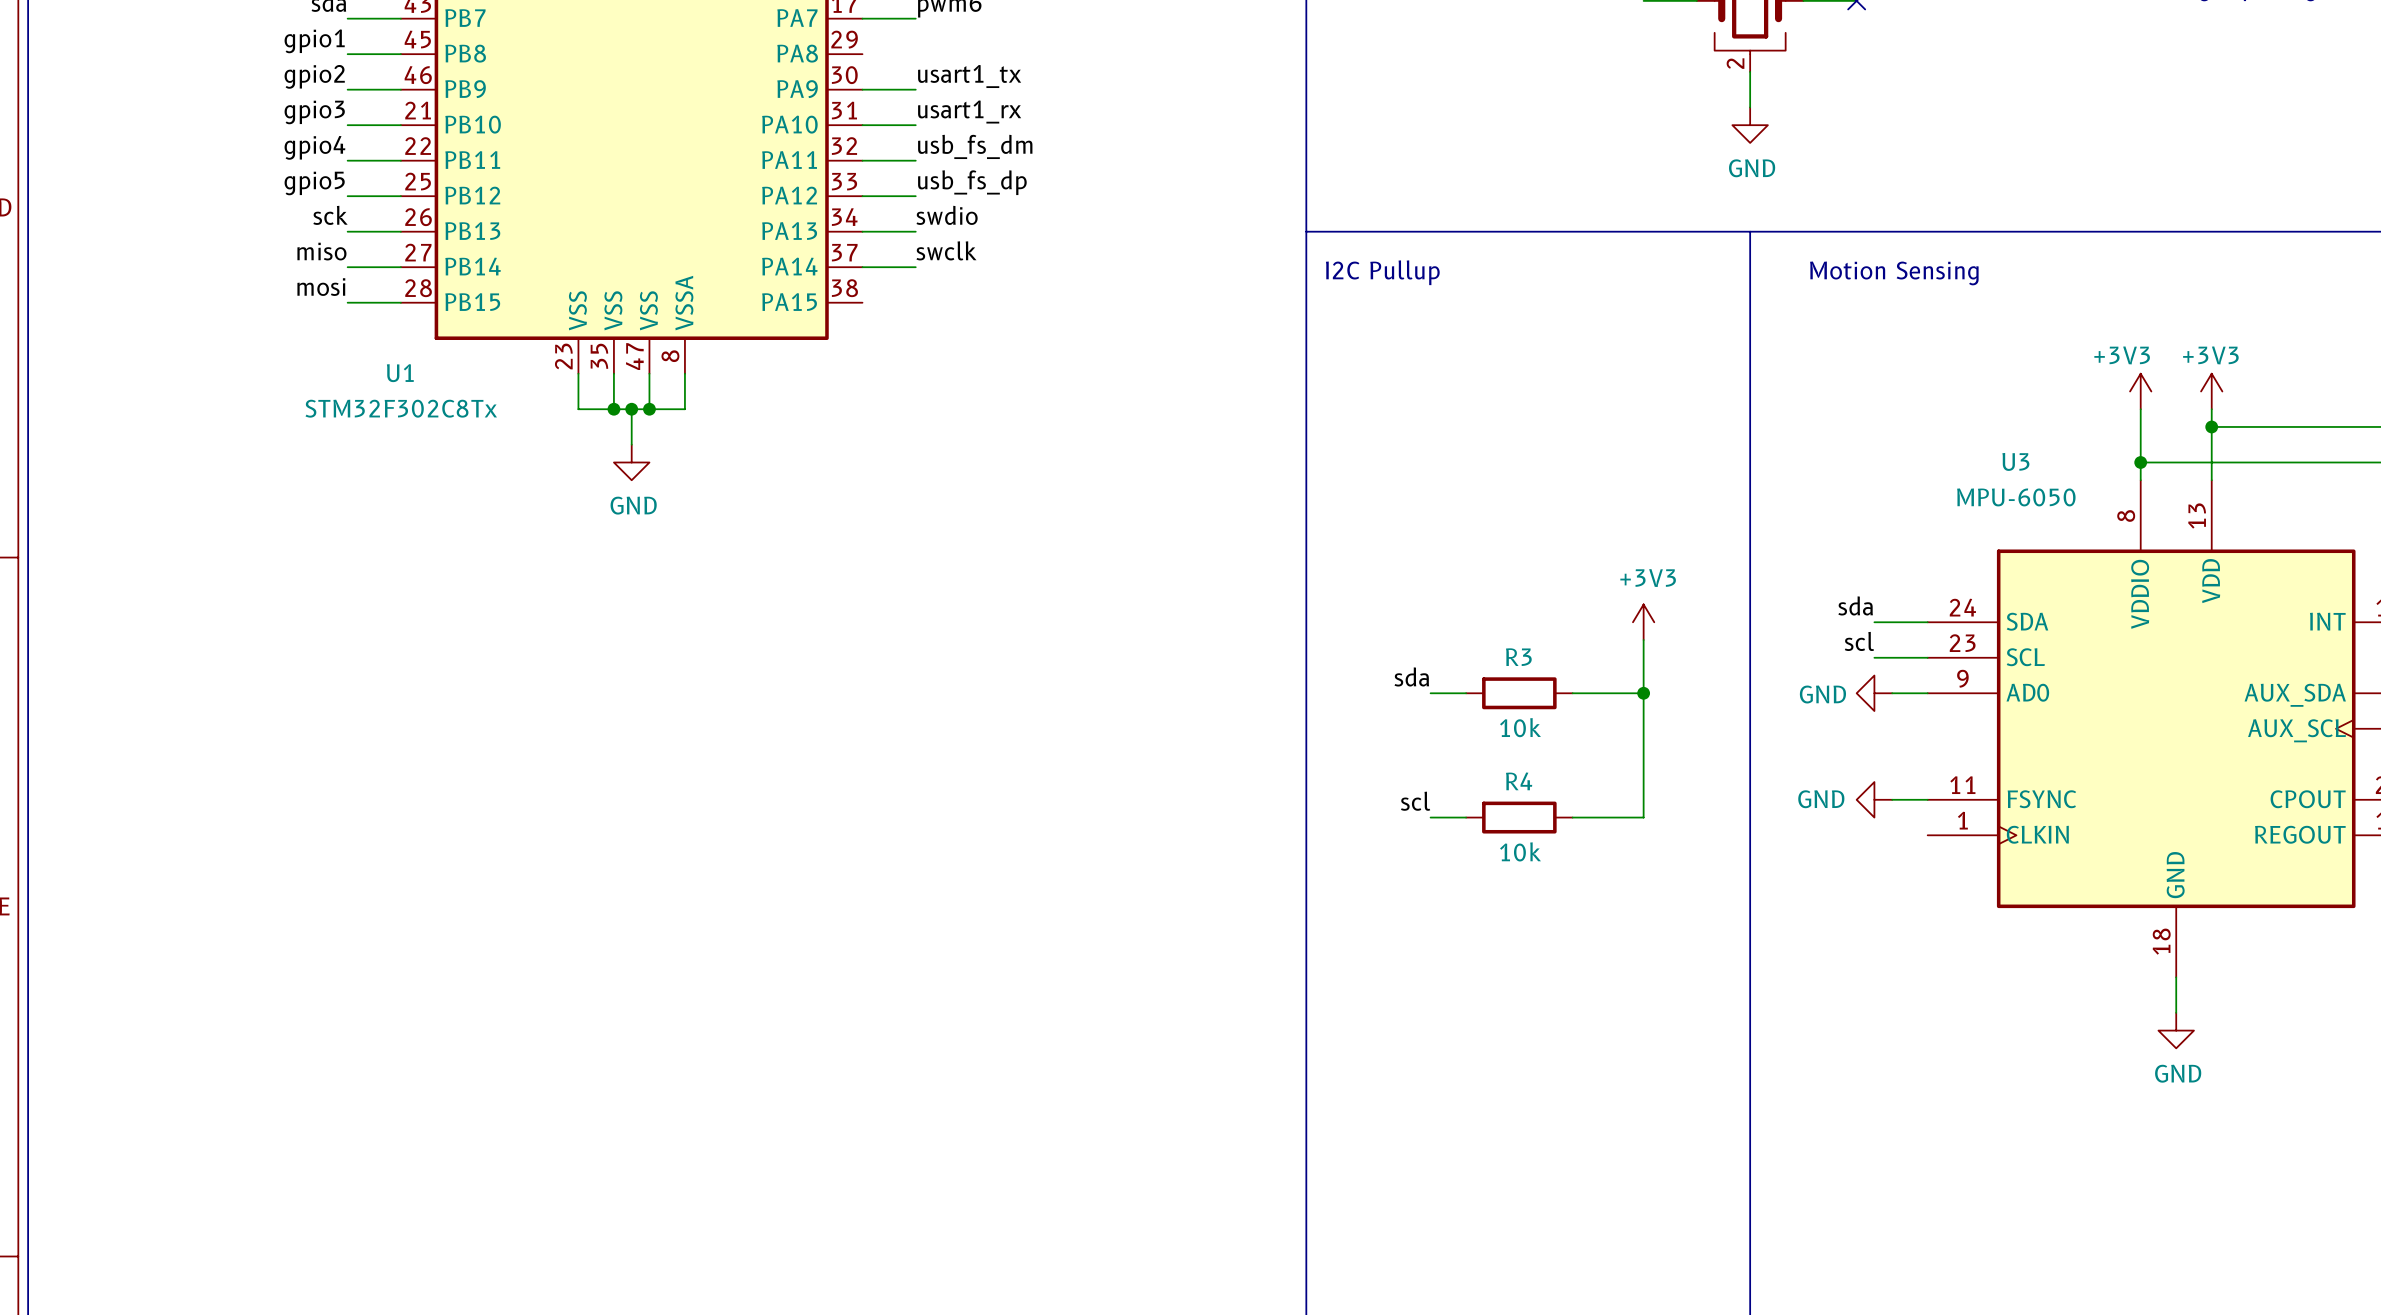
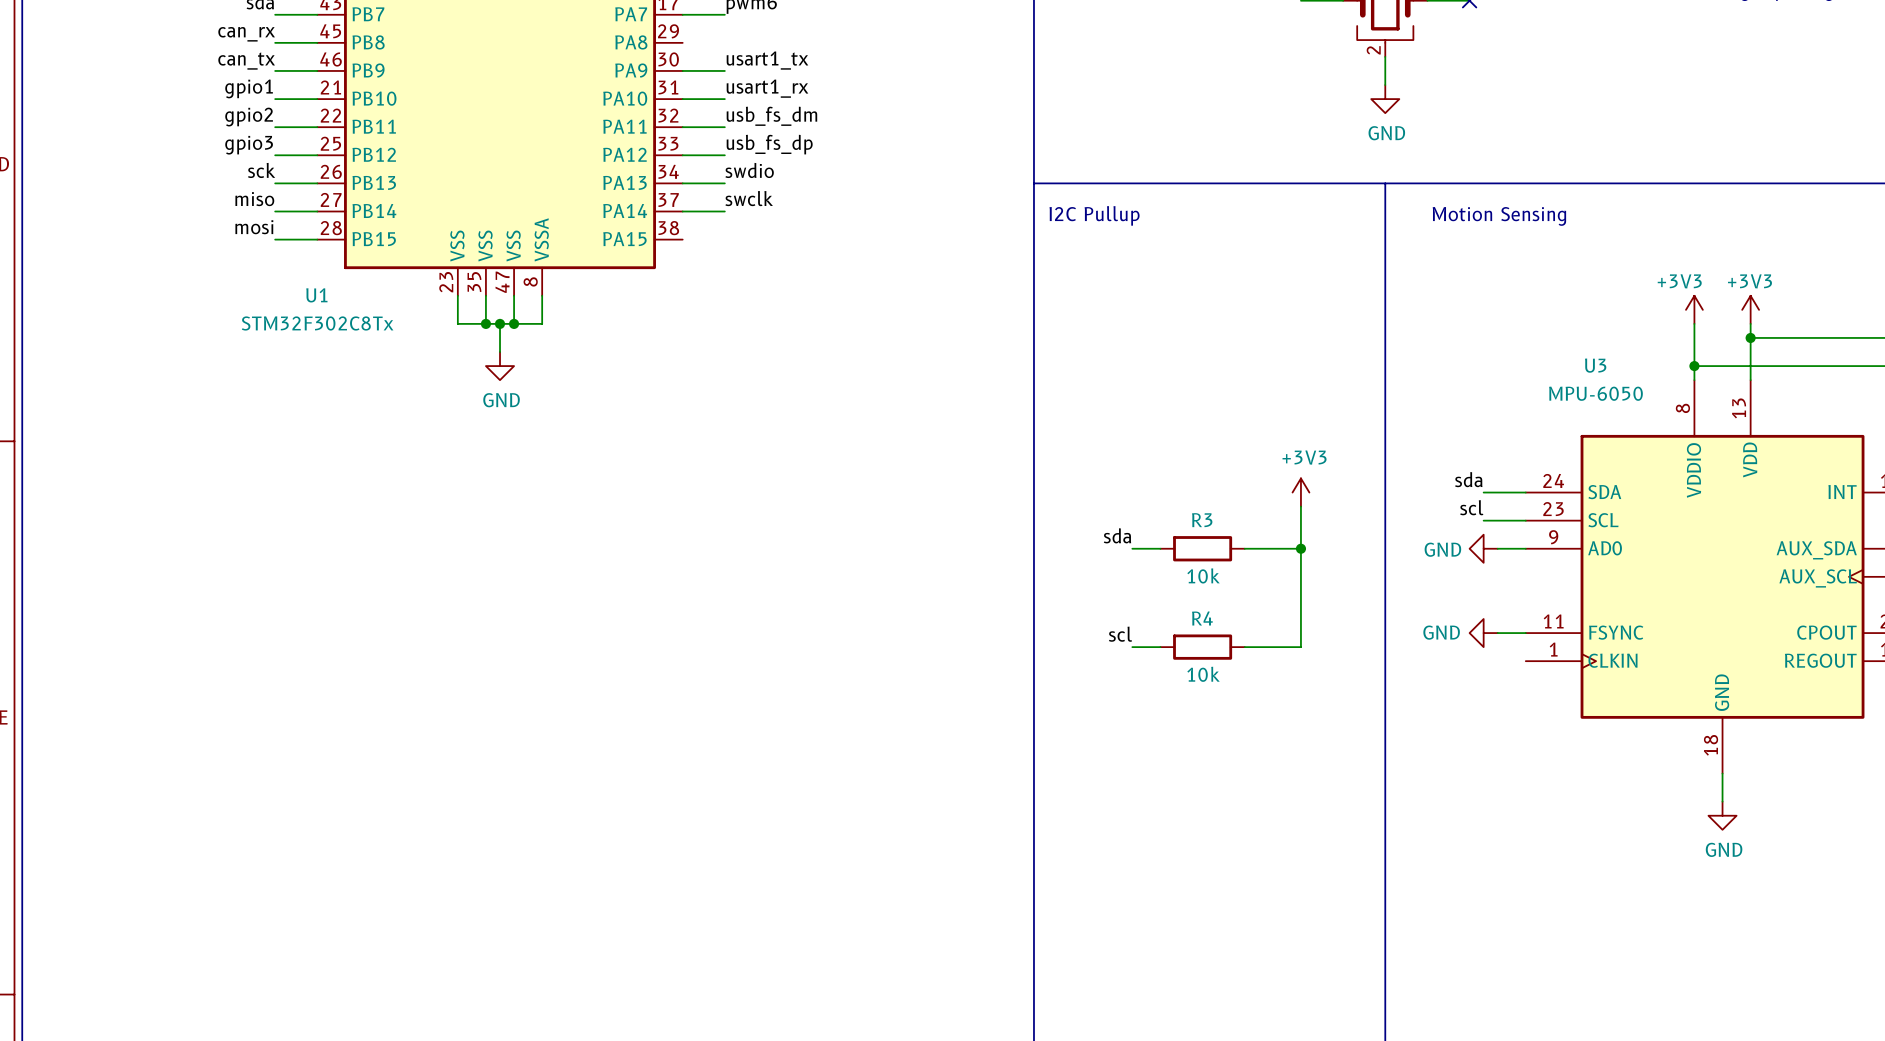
label: gpio1 (314, 41) -> can_rx (246, 34)
label: gpio2 (314, 76) -> can_tx (246, 61)
label: gpio3 (314, 112) -> gpio1 (249, 88)
label: gpio4 (314, 147) -> gpio2 (249, 117)
label: gpio5 (314, 183) -> gpio3 (249, 145)

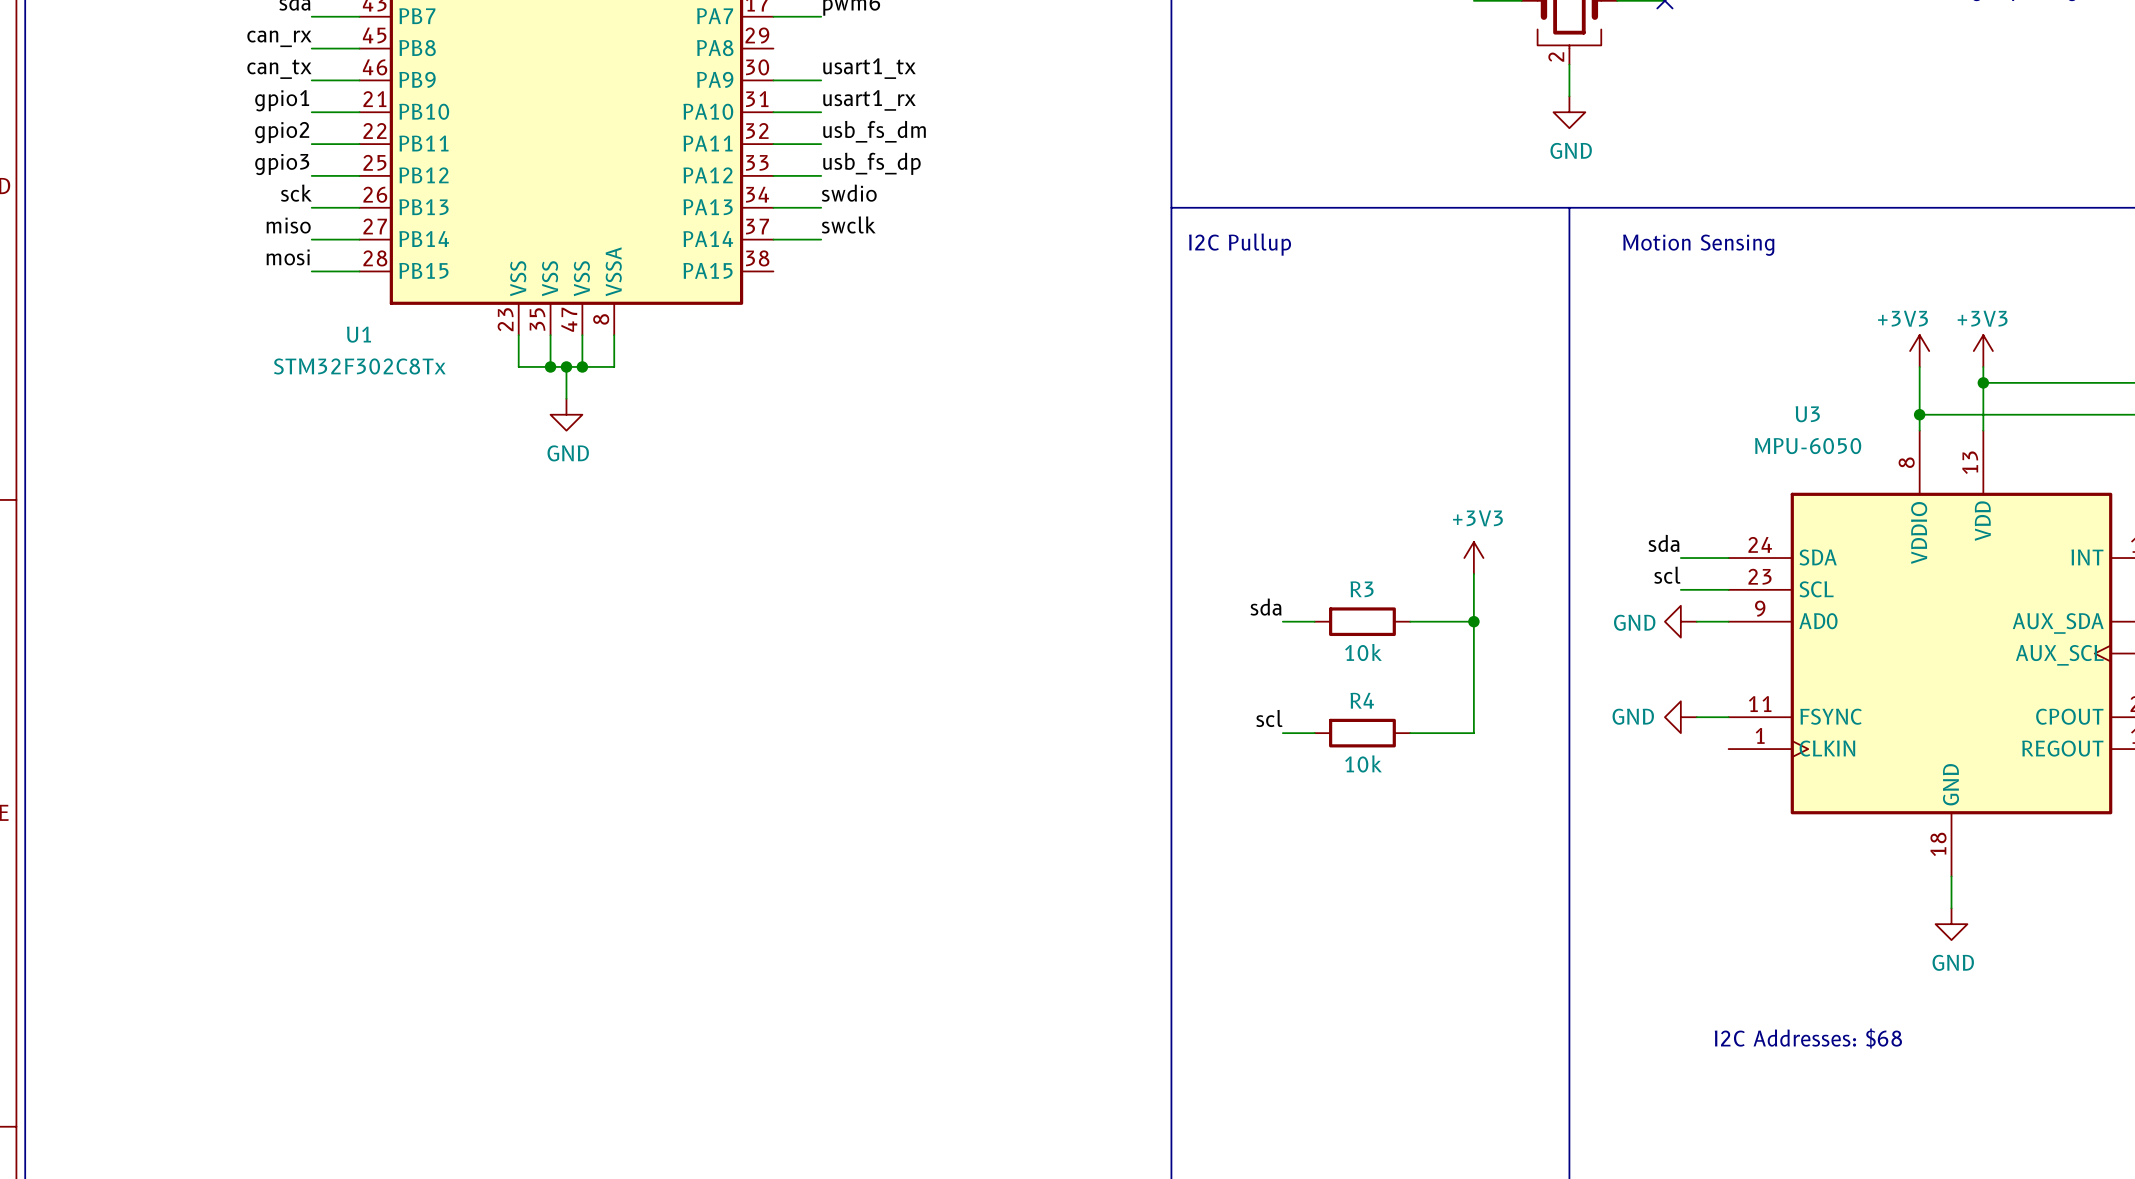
text: none -> I2C Addresses: $68 (1808, 1038)

